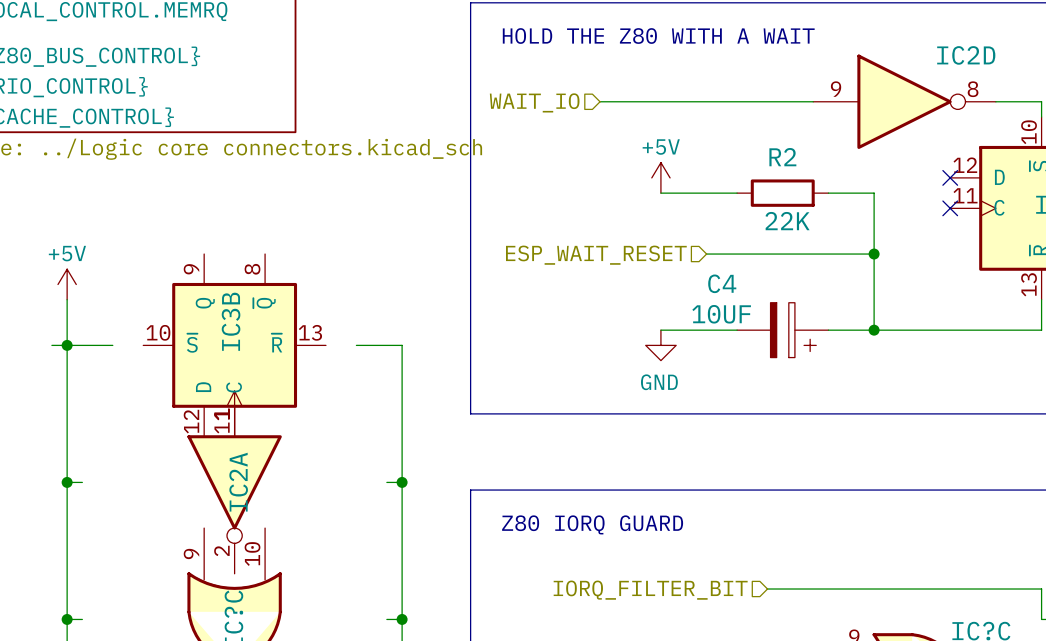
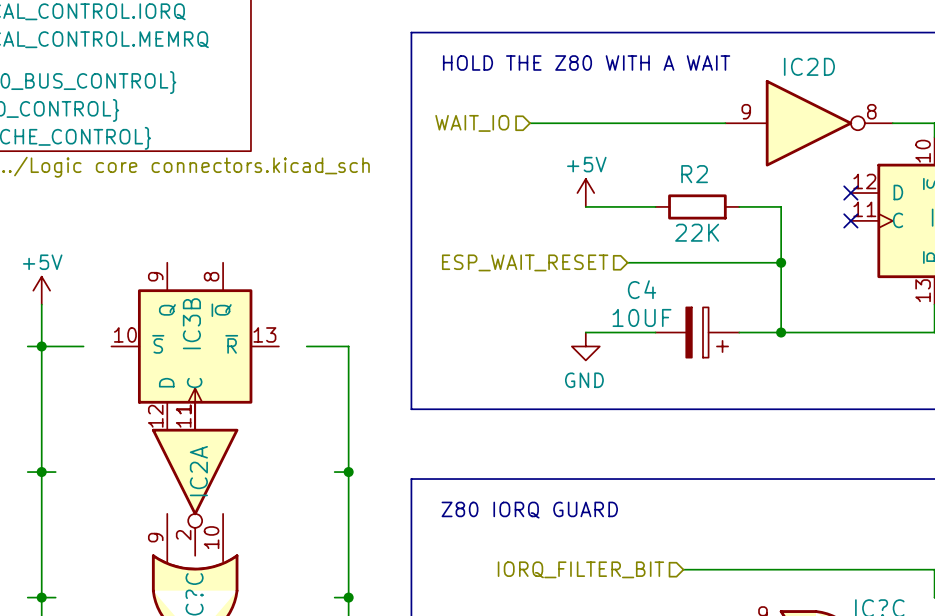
IC2D name position: IC2D (966, 55) -> IC2D (809, 66)
wire: none -> (27, 472) (41, 472)
wire: none -> (27, 597) (41, 597)

